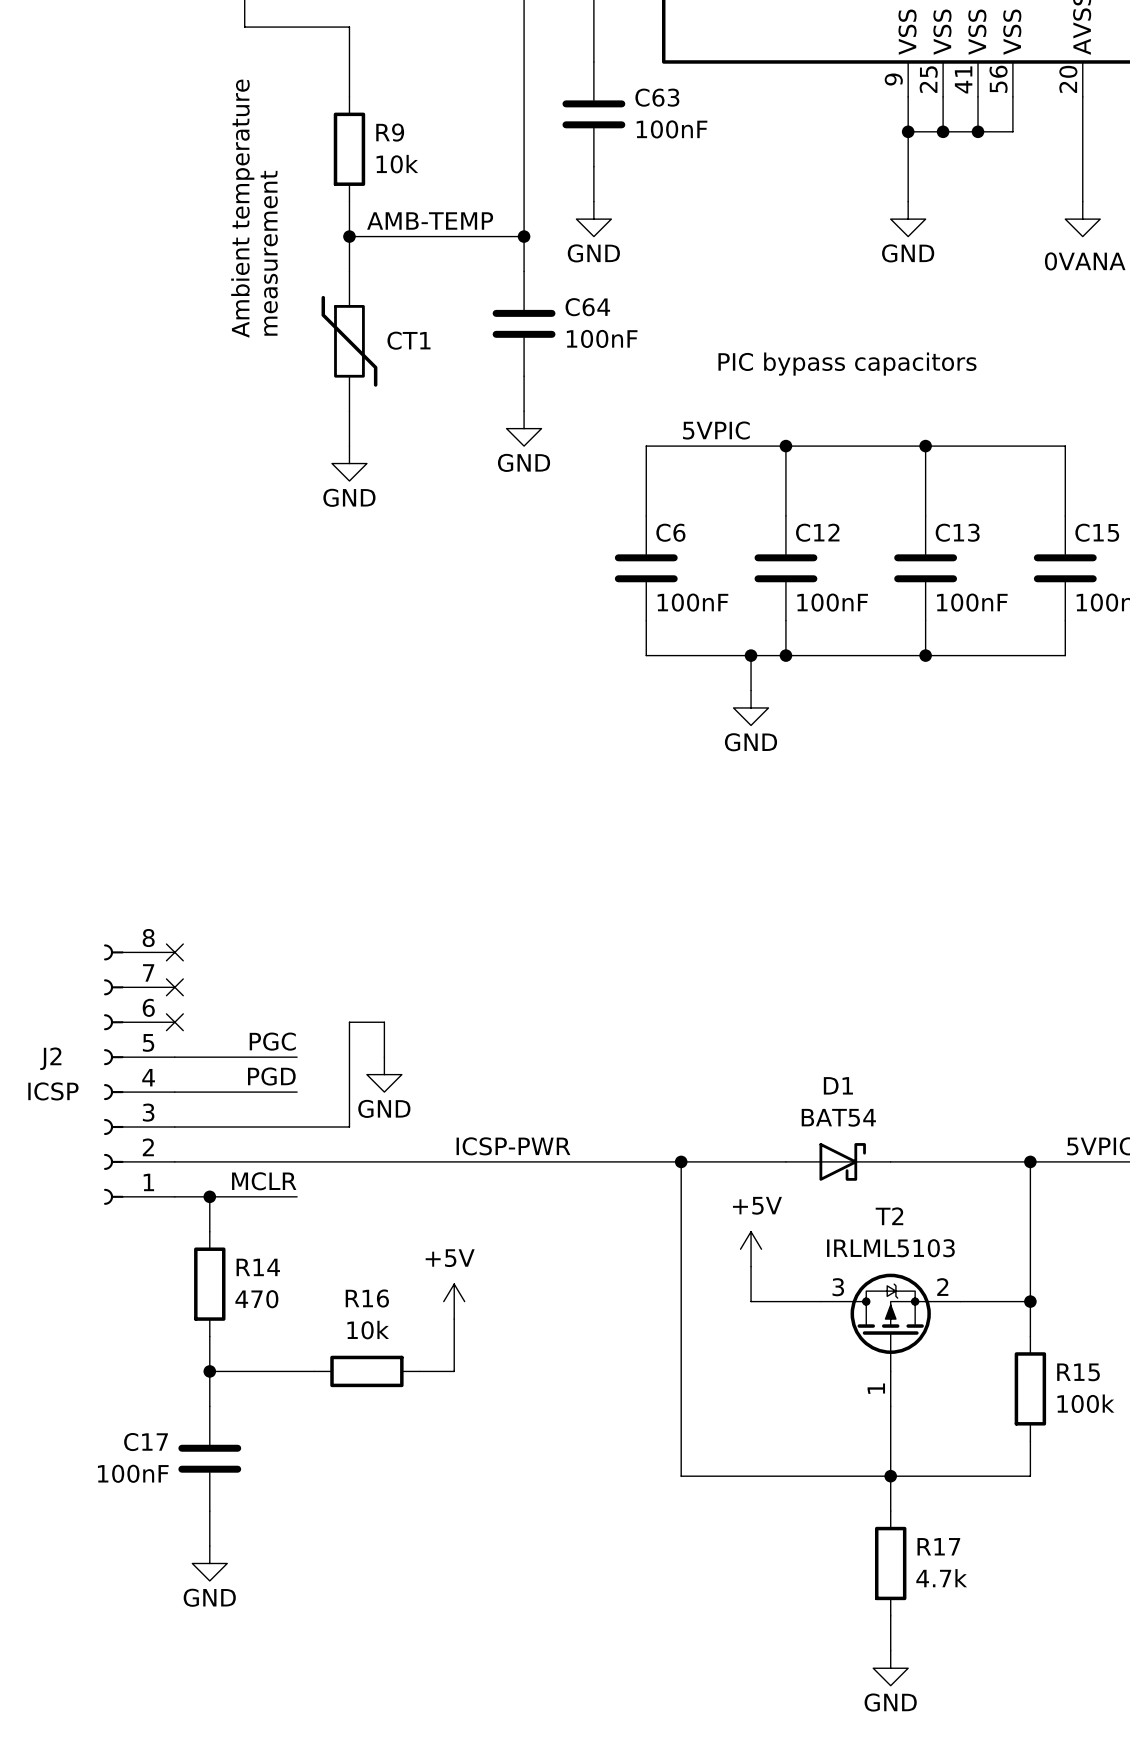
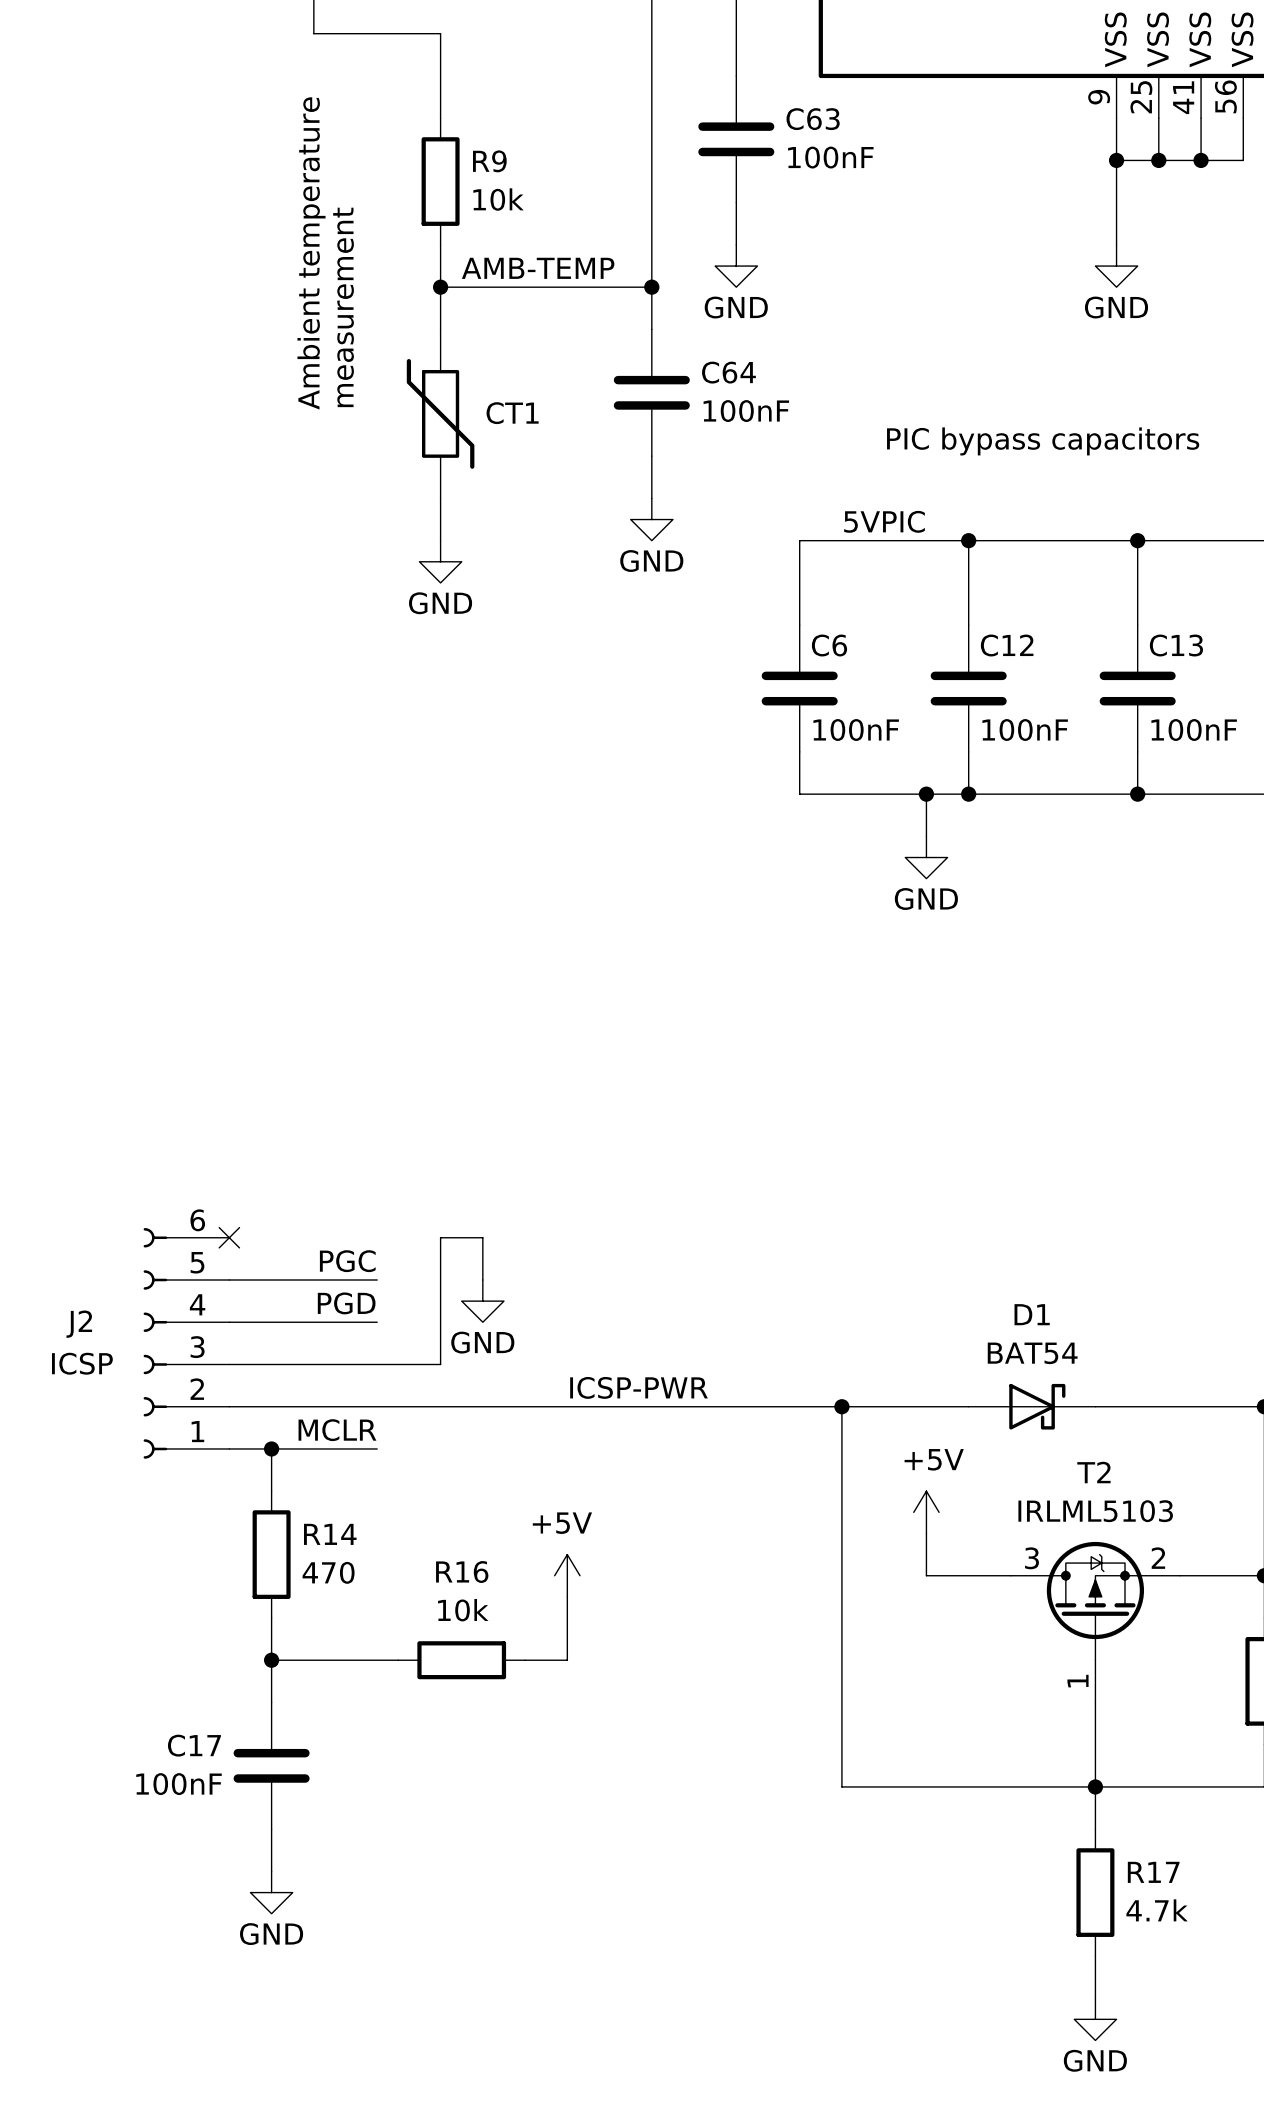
J2 symbol: [104, 944, 175, 1205] -> [143, 1228, 230, 1459]
no-connect mark: (174, 952) -> none
no-connect mark: (174, 987) -> none

